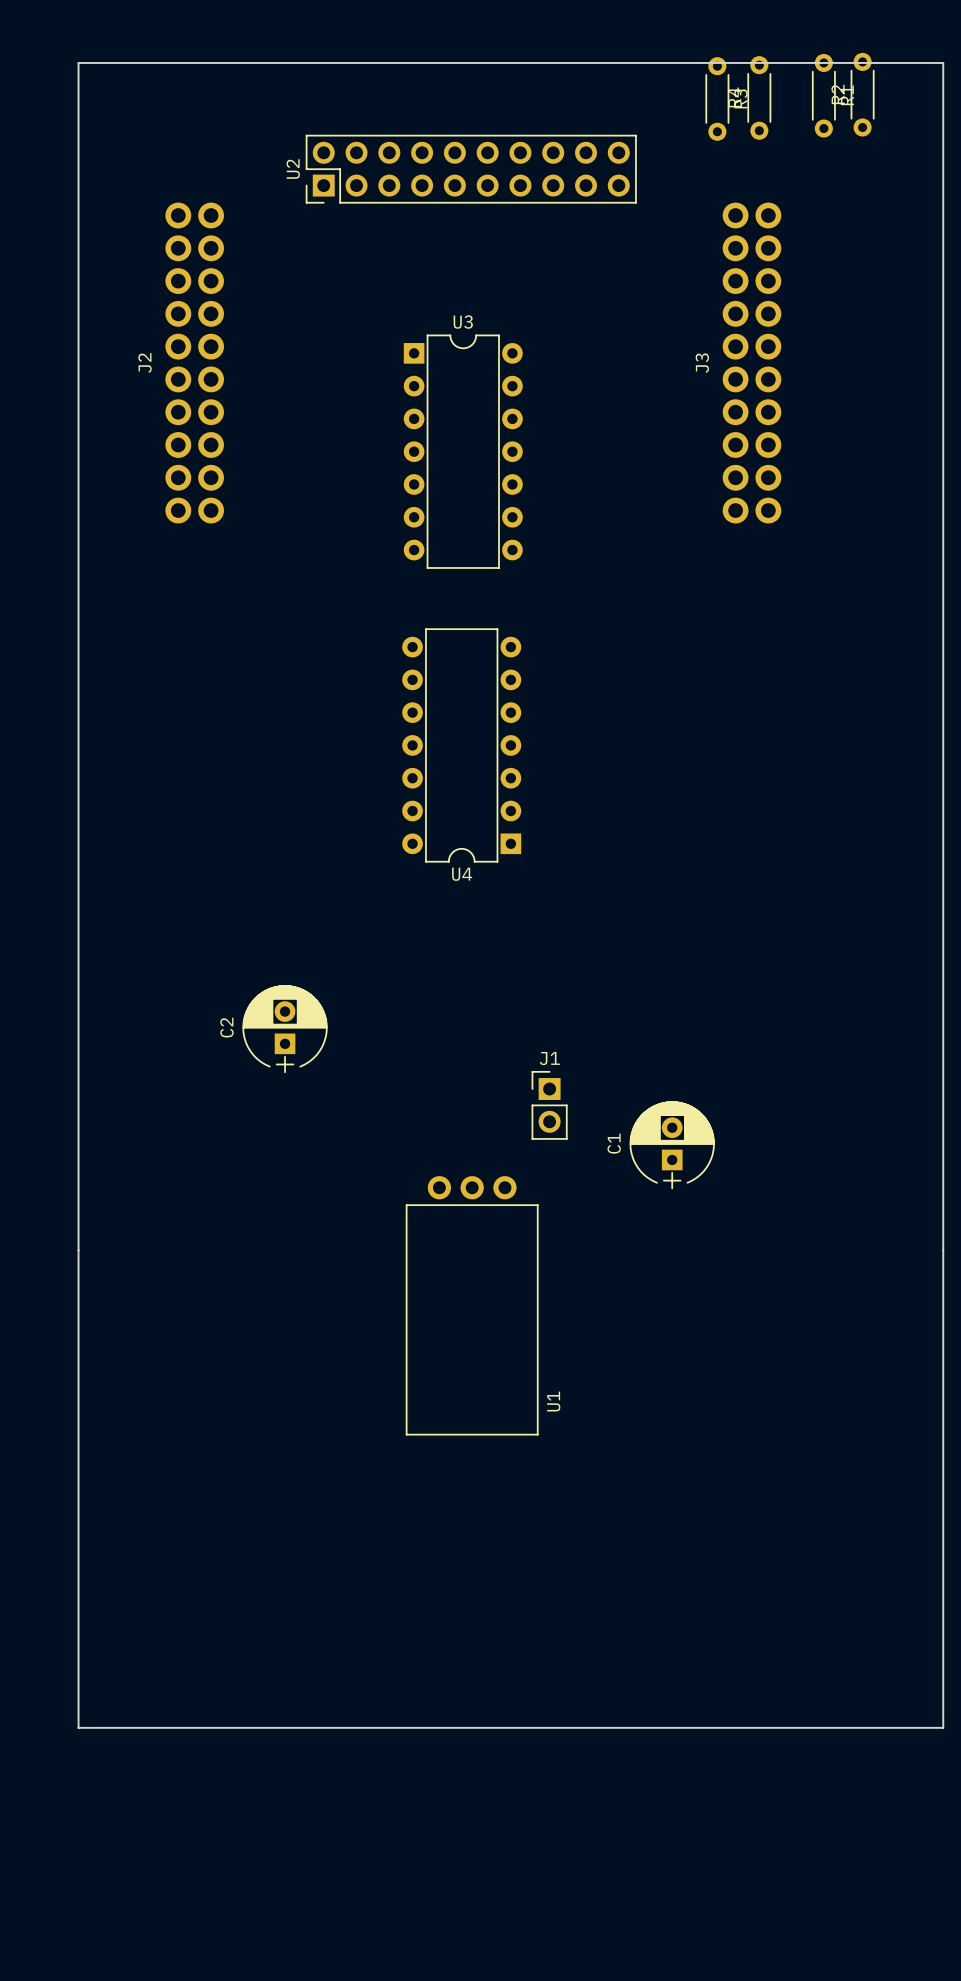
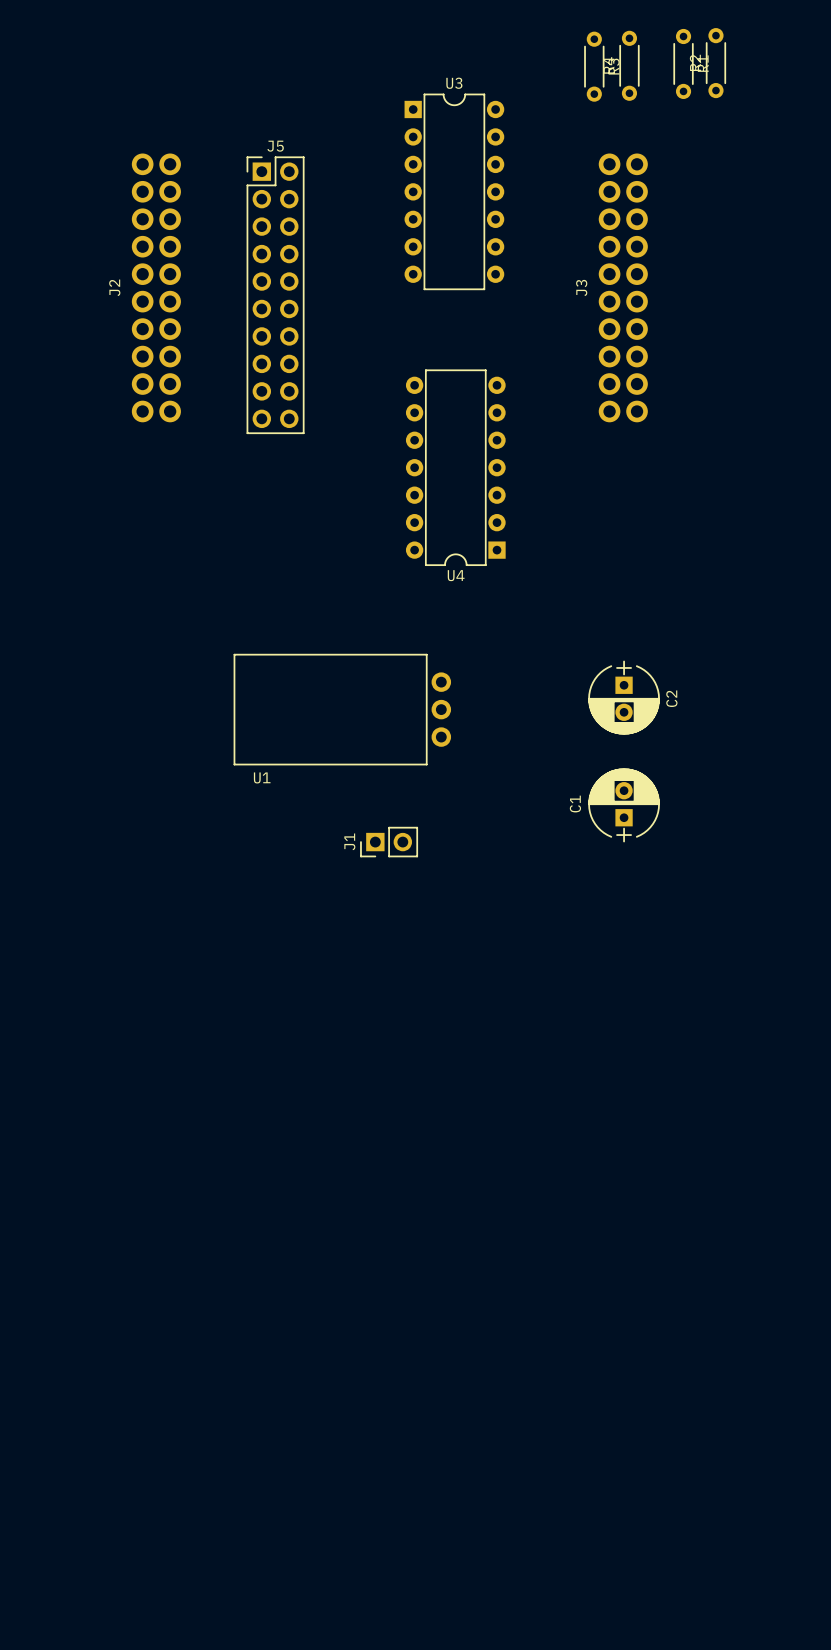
board edge: (78, 62) (78, 1727) (943, 1727) (943, 62) (78, 62) -> none
U2: (471, 169) -> none
J5: none -> (275, 295)
U3 position: (463, 451) -> (454, 191)
U4 position: (461, 745) -> (455, 467)
C2 rotation: 0° (285, 1029) -> 180° (624, 697)
C2 position: (285, 1029) -> (624, 697)
J1 rotation: 0° (549, 1105) -> 90° counterclockwise (389, 842)
J1 position: (549, 1105) -> (389, 842)
C1 position: (672, 1145) -> (624, 805)
U1 rotation: 0° (472, 1305) -> 90° clockwise (342, 709)
U1 position: (472, 1305) -> (342, 709)

